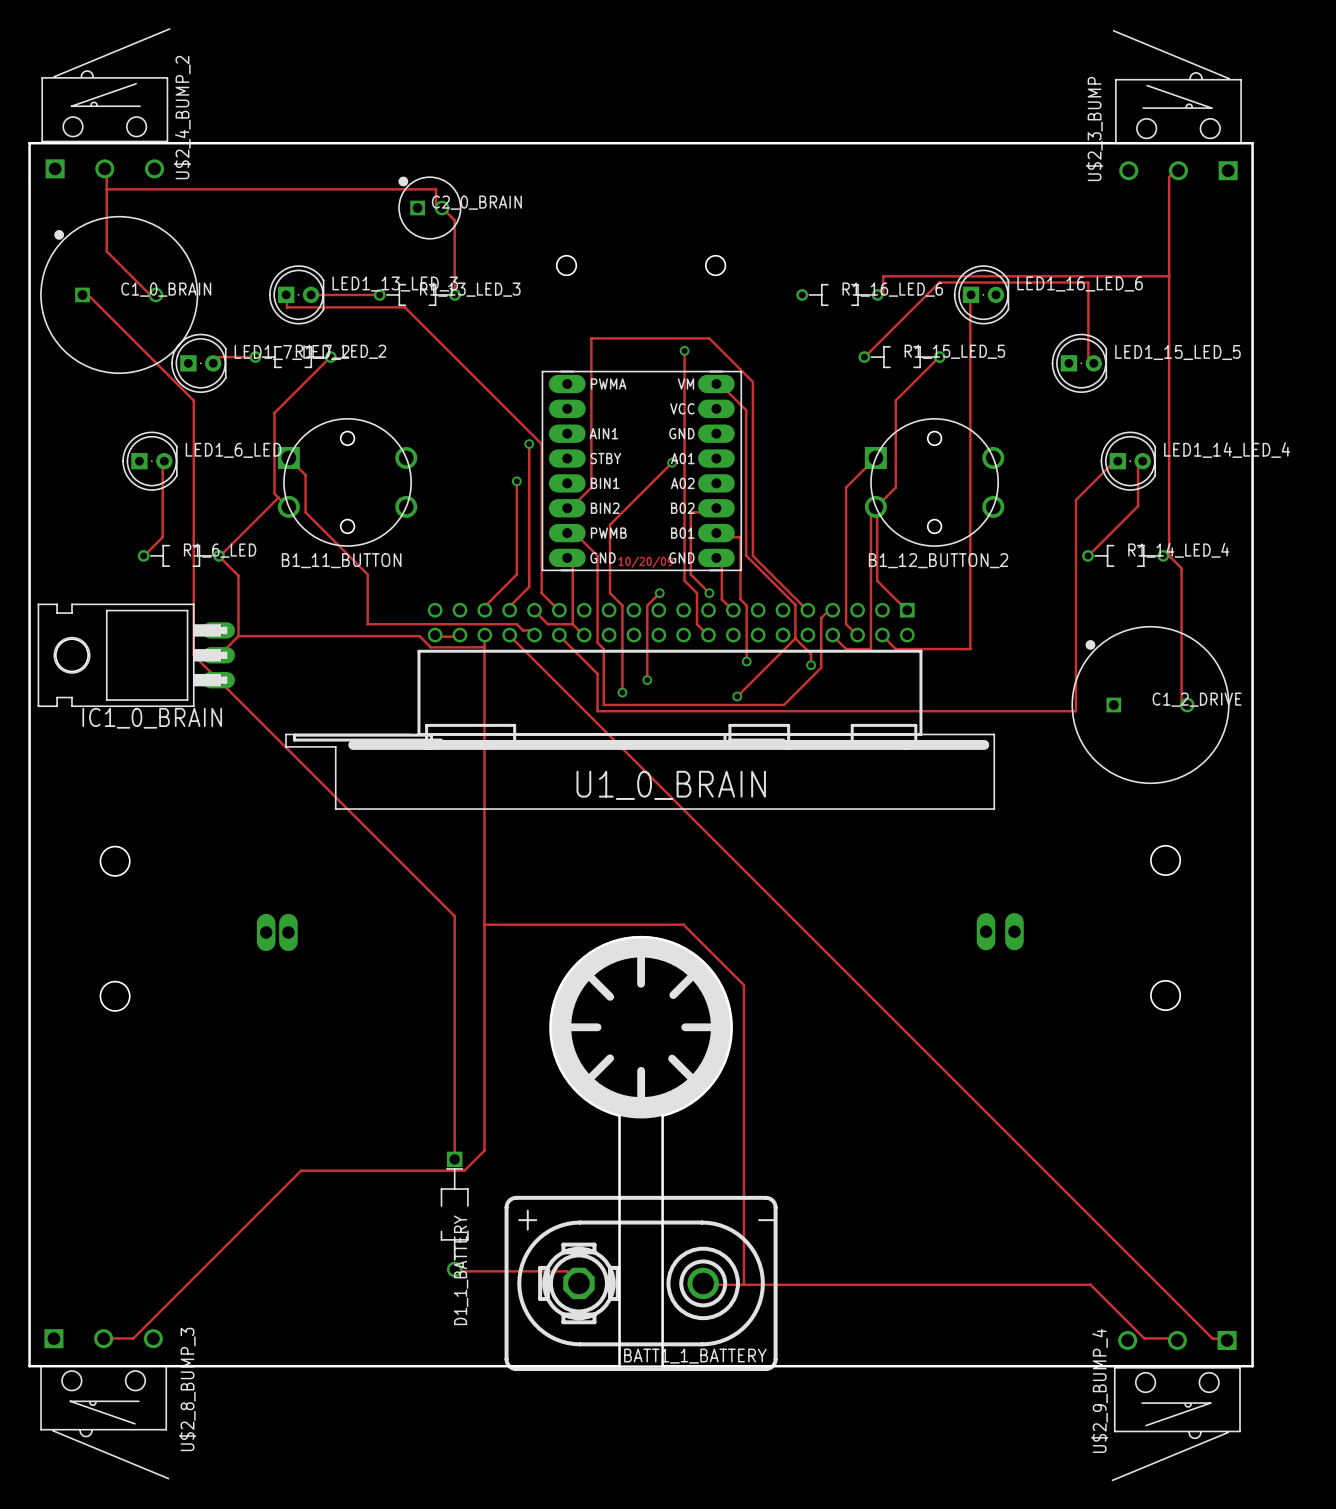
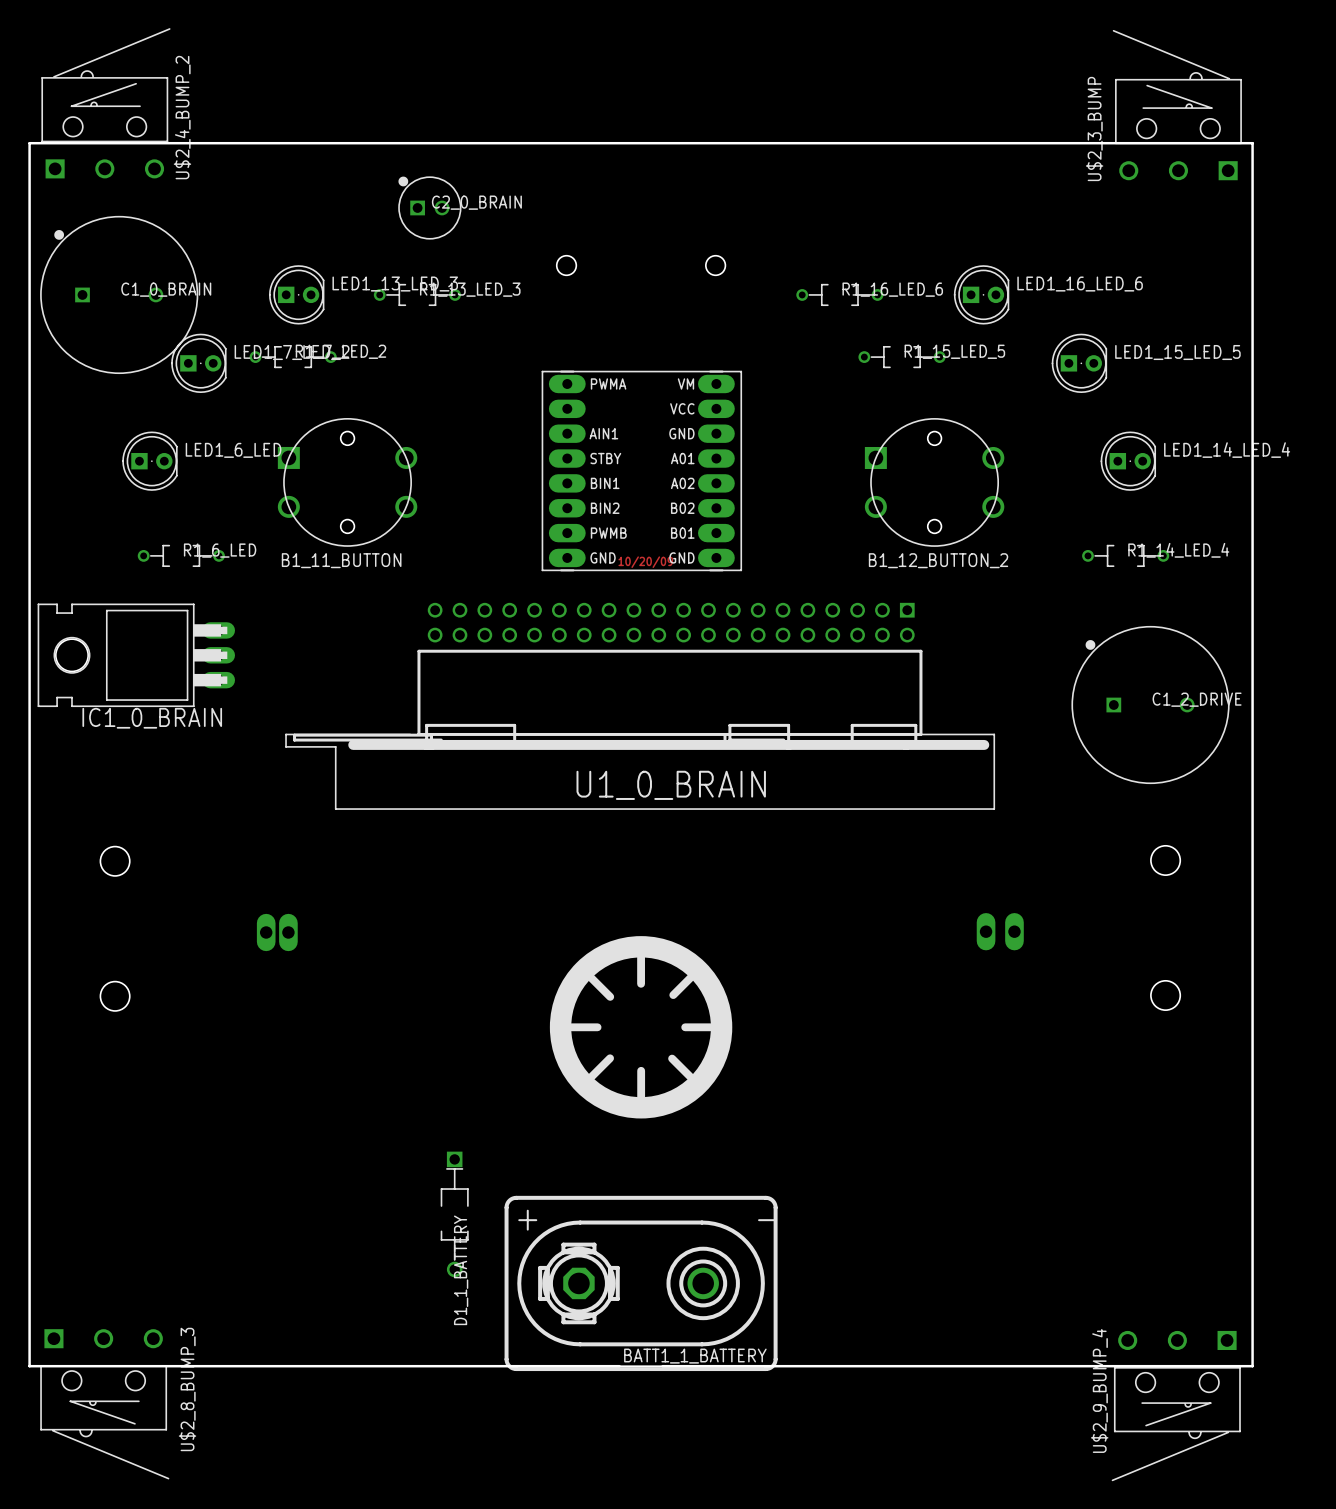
track: (104, 168) (106, 170) (106, 251) (150, 294) (155, 294) -> none
track: (1178, 170) (1175, 170) (1169, 176) (1169, 555) -> none
track: (106, 189) (436, 189) (436, 207) (442, 207) (454, 220) (455, 294) -> none
track: (1169, 276) (883, 276) (883, 294) (877, 294) -> none
track: (82, 294) (88, 294) (193, 400) (193, 655) (454, 916) (454, 1159) -> none
track: (286, 294) (286, 307) (404, 307) (541, 444) (541, 593) (559, 610) -> none
track: (311, 294) (379, 294) -> none
track: (971, 294) (970, 649) (895, 649) (882, 635) -> none
track: (684, 350) (684, 580) (696, 593) (696, 624) (708, 635) -> none
via: (684, 350) -> none
track: (255, 357) (218, 357) (218, 363) (213, 363) -> none
track: (330, 357) (274, 413) (274, 493) (288, 506) -> none
track: (864, 357) (939, 282) (1088, 282) (1088, 363) (1093, 363) -> none
track: (939, 357) (895, 400) (895, 487) (875, 506) -> none
track: (716, 383) (721, 385) (746, 410) (746, 555) (795, 604) (795, 638) -> none
track: (529, 444) (529, 586) (510, 605) (509, 610) -> none
via: (529, 444) -> none
track: (288, 457) (305, 475) (305, 512) (367, 574) (367, 624) (516, 624) (523, 630) (529, 630) (534, 635) -> none
track: (875, 457) (846, 487) (846, 624) (857, 635) -> none
track: (164, 461) (162, 462) (162, 537) (143, 555) -> none
track: (1117, 461) (1113, 462) (1075, 499) (1075, 711) (597, 711) (597, 673) (559, 635) -> none
track: (1142, 461) (1138, 462) (1138, 506) (1088, 555) -> none
track: (672, 462) (610, 524) (610, 593) (622, 605) (622, 692) -> none
via: (672, 462) -> none
track: (516, 481) (516, 574) (485, 605) (484, 610) -> none
via: (516, 481) -> none
track: (278, 497) (219, 555) (238, 575) (238, 636) -> none
track: (875, 506) (877, 580) (907, 610) -> none
track: (875, 506) (870, 512) (870, 649) (846, 649) (832, 635) -> none
track: (567, 508) (572, 506) (591, 487) (591, 338) (709, 338) (752, 381) (752, 555) (807, 610) -> none
track: (716, 508) (715, 512) (690, 512) (690, 574) (709, 593) -> none
track: (567, 533) (572, 531) (597, 555) (597, 642) (603, 649) (603, 705) (783, 705) (821, 667) (821, 618) (827, 611) (832, 610) -> none
track: (716, 533) (721, 537) (740, 537) (740, 599) (746, 605) (746, 661) -> none
track: (1169, 555) (1181, 568) (1181, 705) (1187, 705) -> none
track: (567, 557) (572, 562) (572, 624) -> none
track: (716, 557) (721, 562) (721, 599) (733, 610) -> none
track: (659, 593) (647, 605) (647, 680) -> none
via: (659, 593) -> none
via: (709, 593) -> none
track: (534, 610) (547, 624) (572, 624) -> none
track: (572, 624) (584, 635) -> none
track: (435, 635) (436, 636) (459, 635) -> none
track: (484, 635) (484, 1150) (464, 1170) (301, 1170) (133, 1338) (103, 1338) -> none
track: (509, 635) (1212, 1338) (1225, 1338) (1227, 1340) -> none
track: (238, 636) (218, 655) -> none
track: (238, 636) (419, 636) (430, 647) (484, 647) -> none
track: (795, 638) (811, 654) (811, 665) -> none
track: (795, 638) (737, 696) -> none
via: (746, 661) -> none
via: (811, 665) -> none
via: (647, 680) -> none
via: (622, 692) -> none
via: (737, 696) -> none
track: (484, 924) (683, 924) (743, 985) (743, 1284) -> none
track: (454, 1269) (455, 1271) (567, 1271) (578, 1283) -> none
track: (703, 1283) (1090, 1284) (1144, 1338) (1175, 1338) (1177, 1340) -> none
board edge: (619, 1366) (619, 1115) (591, 1103) (568, 1082) (554, 1055) (550, 1024) (556, 994) (563, 980) (578, 962) (603, 945) (618, 940) (641, 937) (664, 940) (678, 945) (704, 962) (718, 980) (725, 994) (731, 1024) (727, 1055) (713, 1082) (690, 1103) (662, 1115) (662, 1366) -> none

